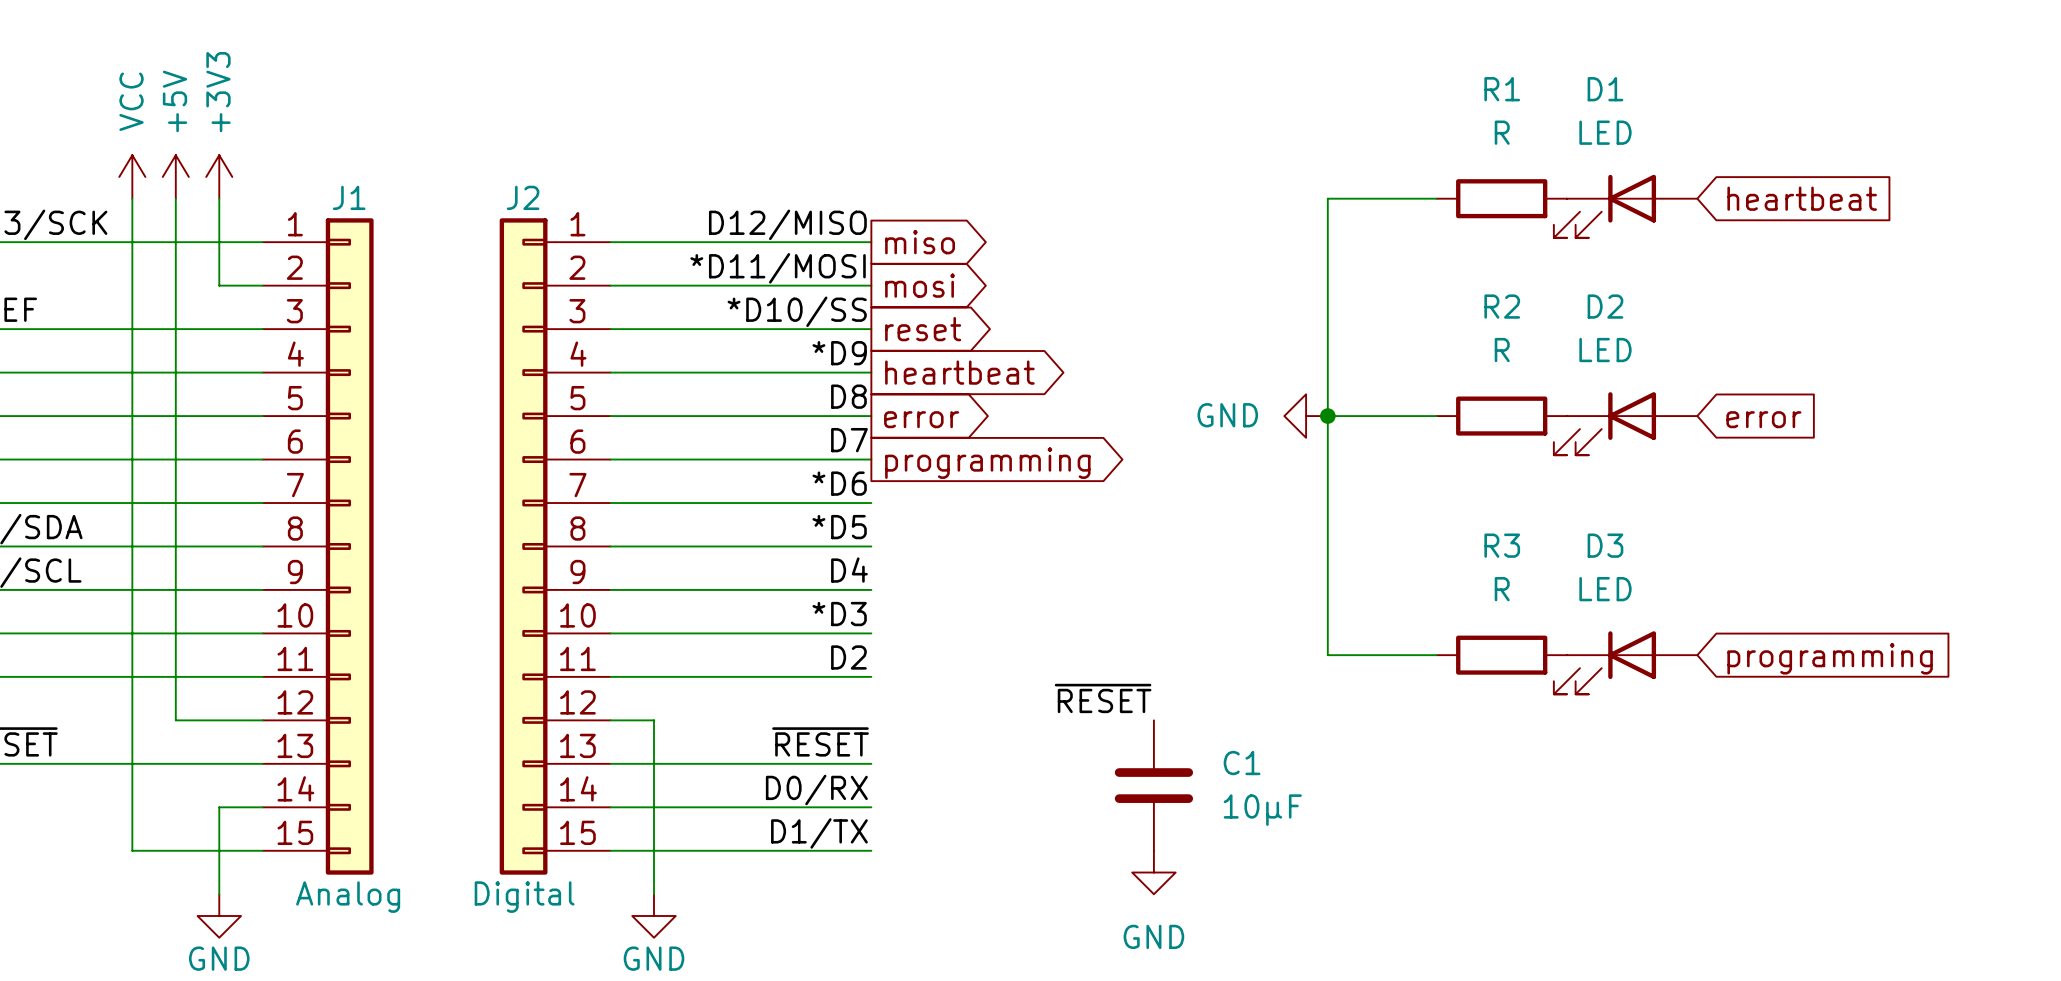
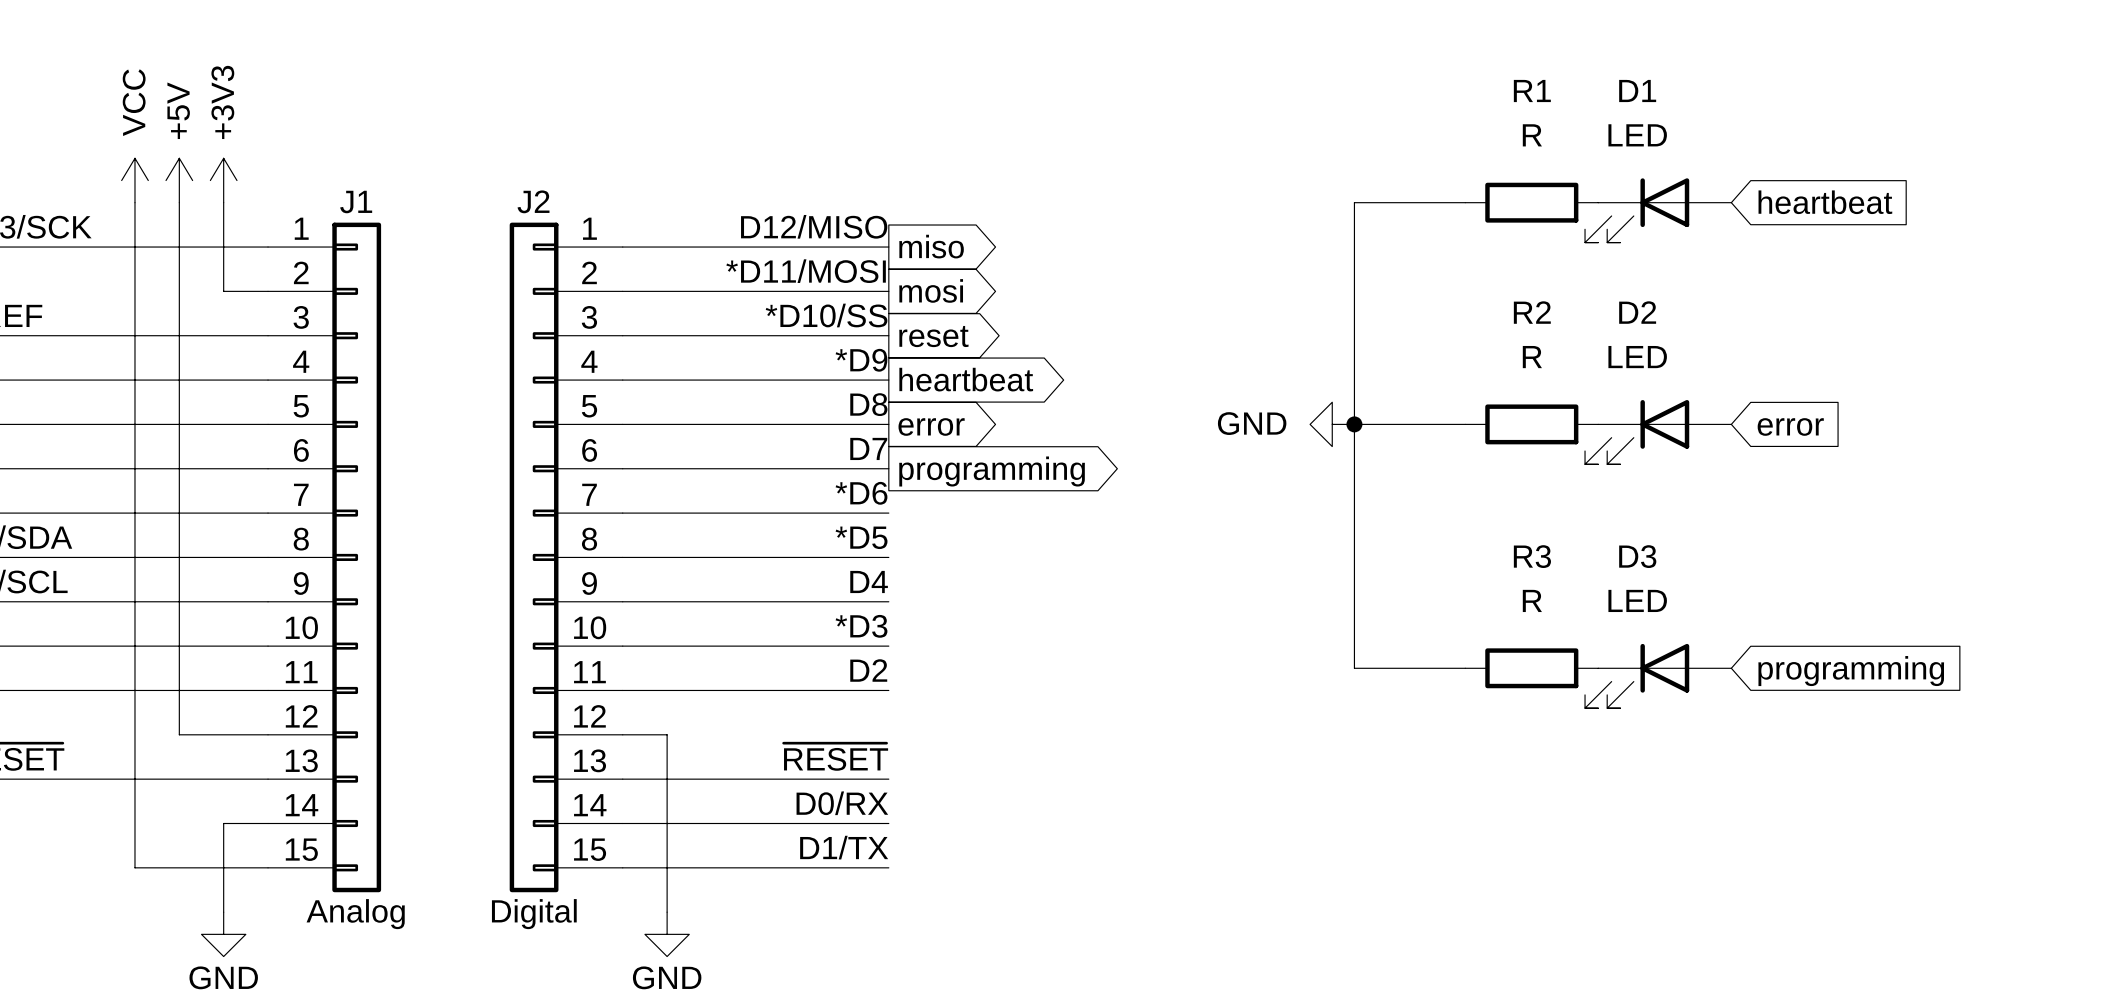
label: ~{RESET} (1103, 698) -> none
C1: 10µF (1153, 785) -> none
power symbol: GND (1153, 872) -> none

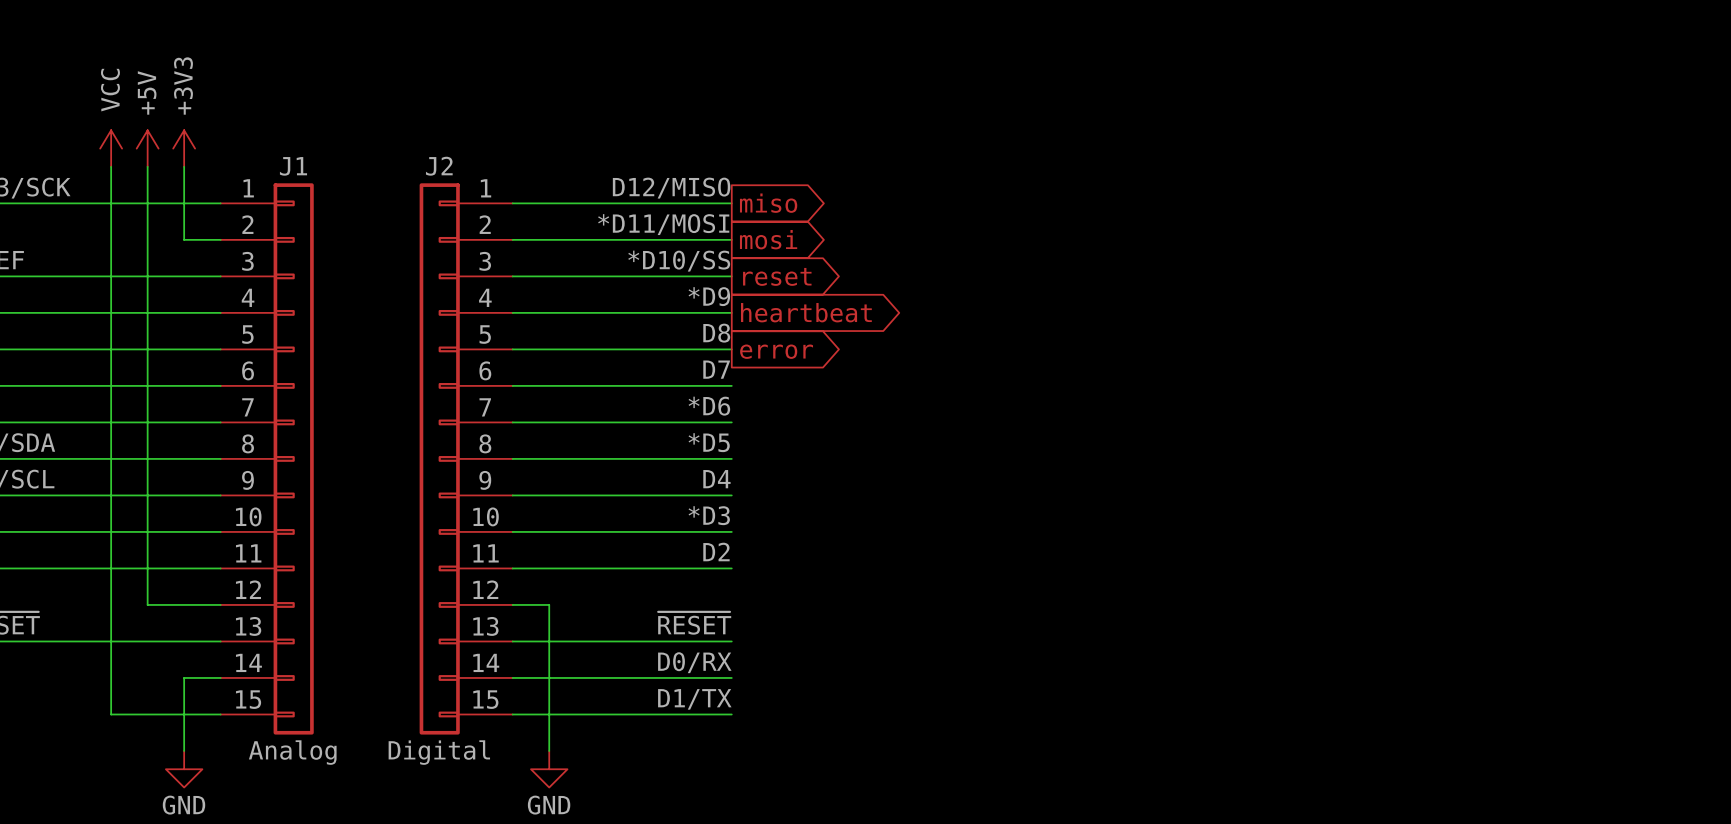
wire: (1465, 202) (1354, 202) (1354, 668) (1465, 668) -> none
R1: R (1531, 202) -> none
global label: heartbeat (1825, 202) -> none
D1: LED (1658, 210) -> none
power symbol: GND (1332, 424) -> none
wire: (1354, 424) (1465, 424) -> none
junction: (1354, 424) -> none
R2: R (1531, 424) -> none
global label: error (1790, 426) -> none
D2: LED (1658, 432) -> none
global label: programming (992, 471) -> none
R3: R (1531, 668) -> none
global label: programming (1851, 671) -> none
D3: LED (1658, 676) -> none

